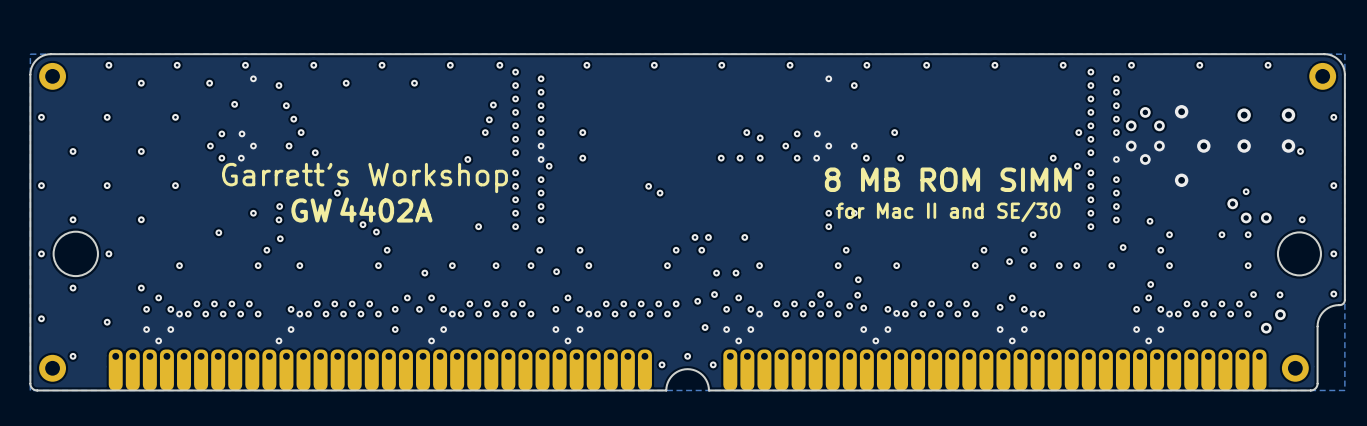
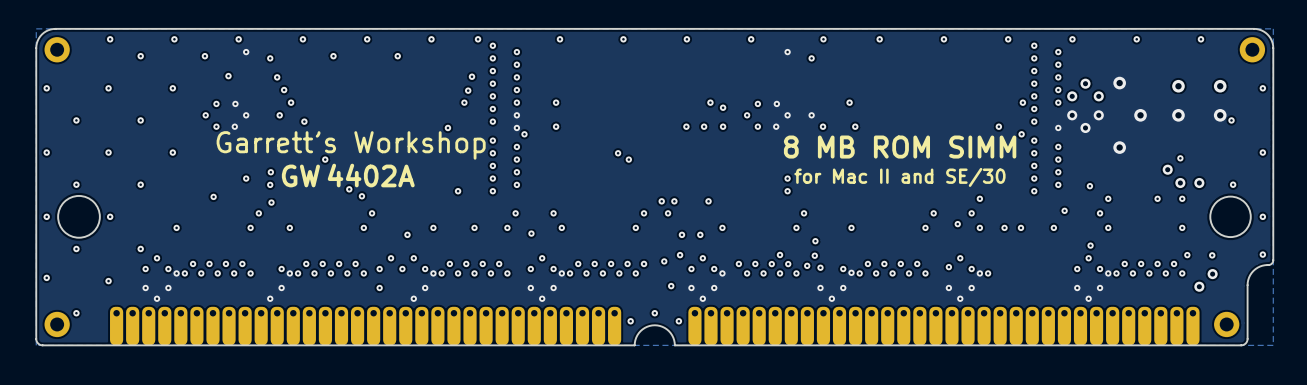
via: (854, 213) -> none

